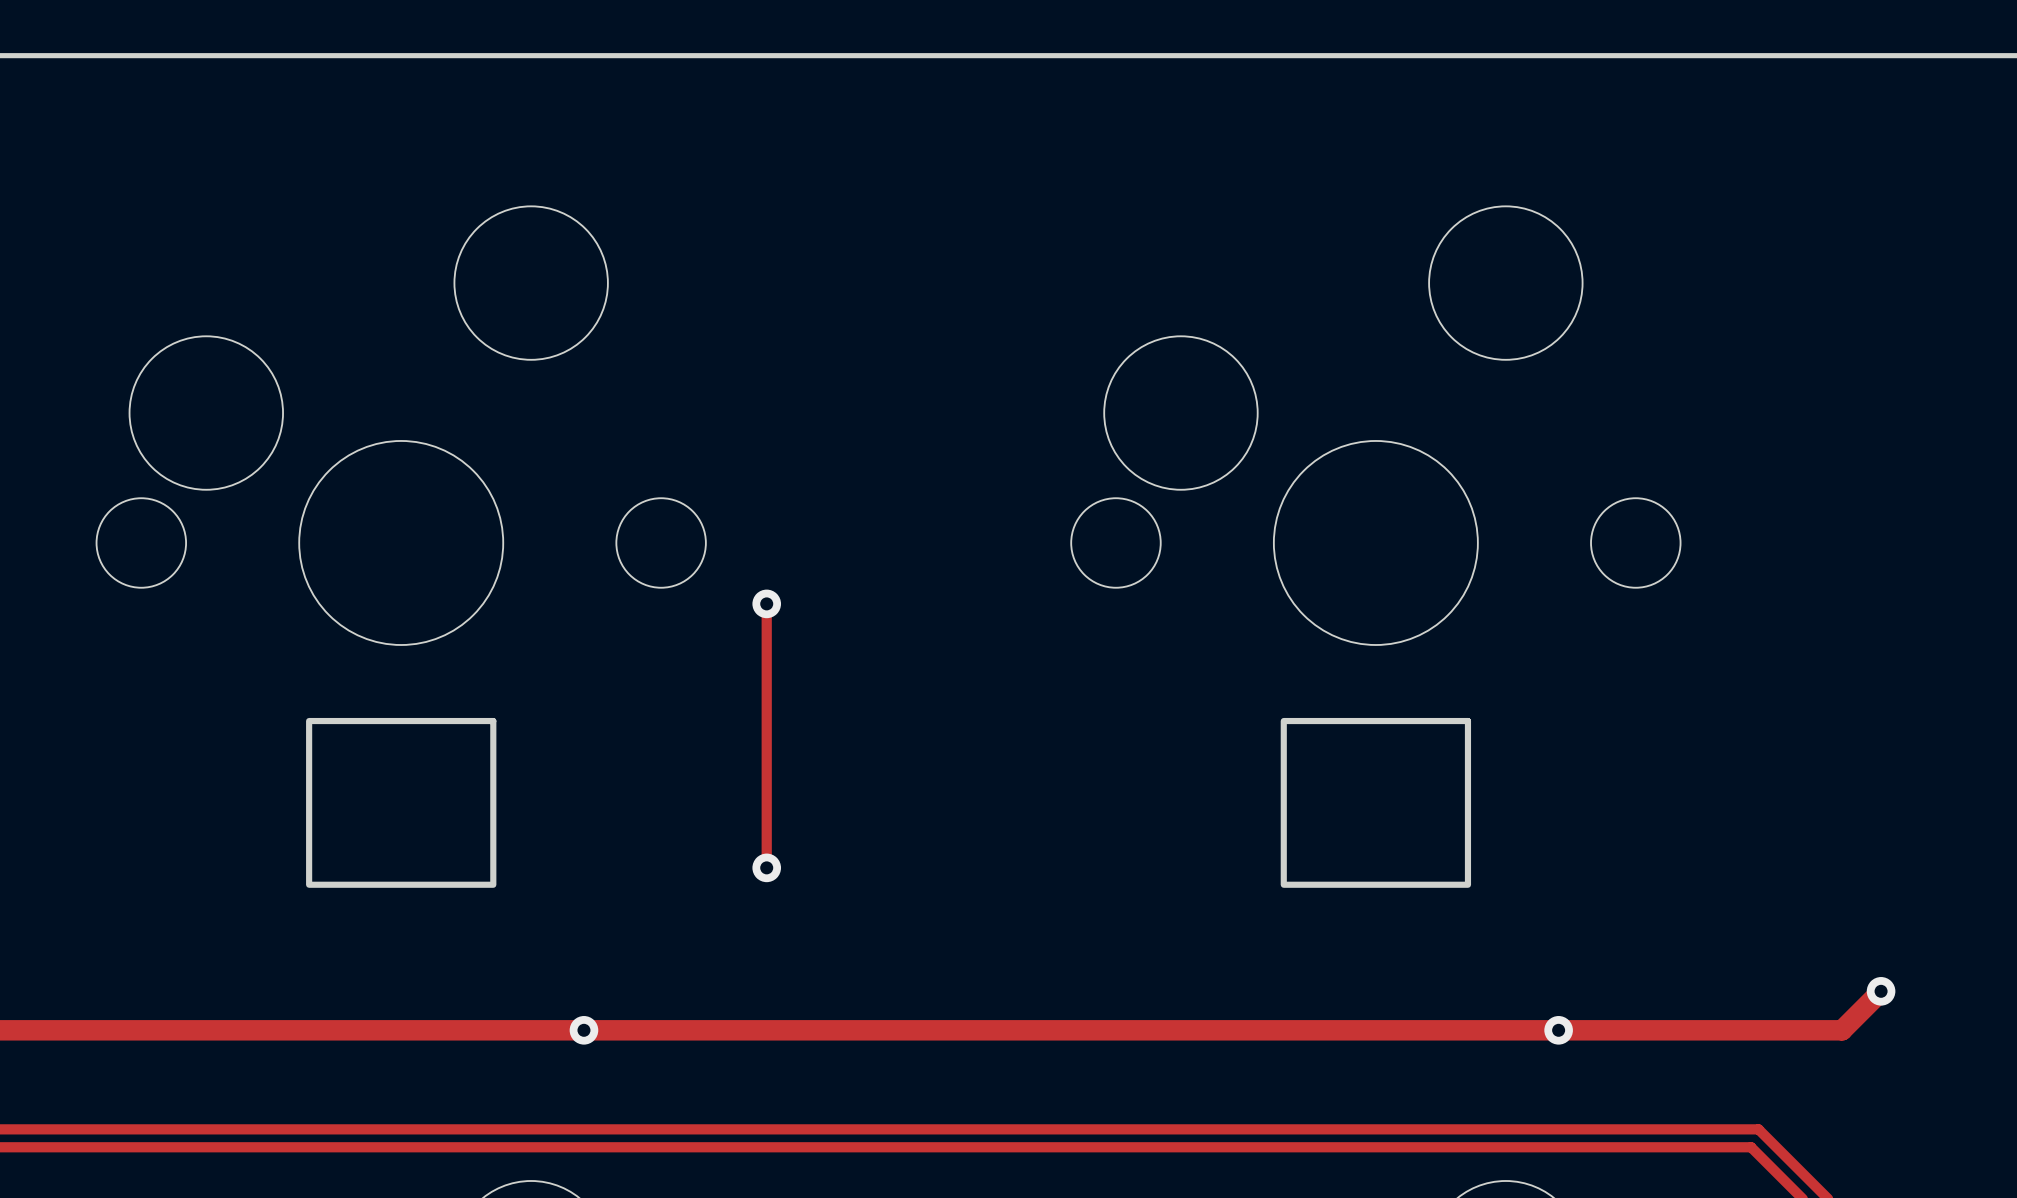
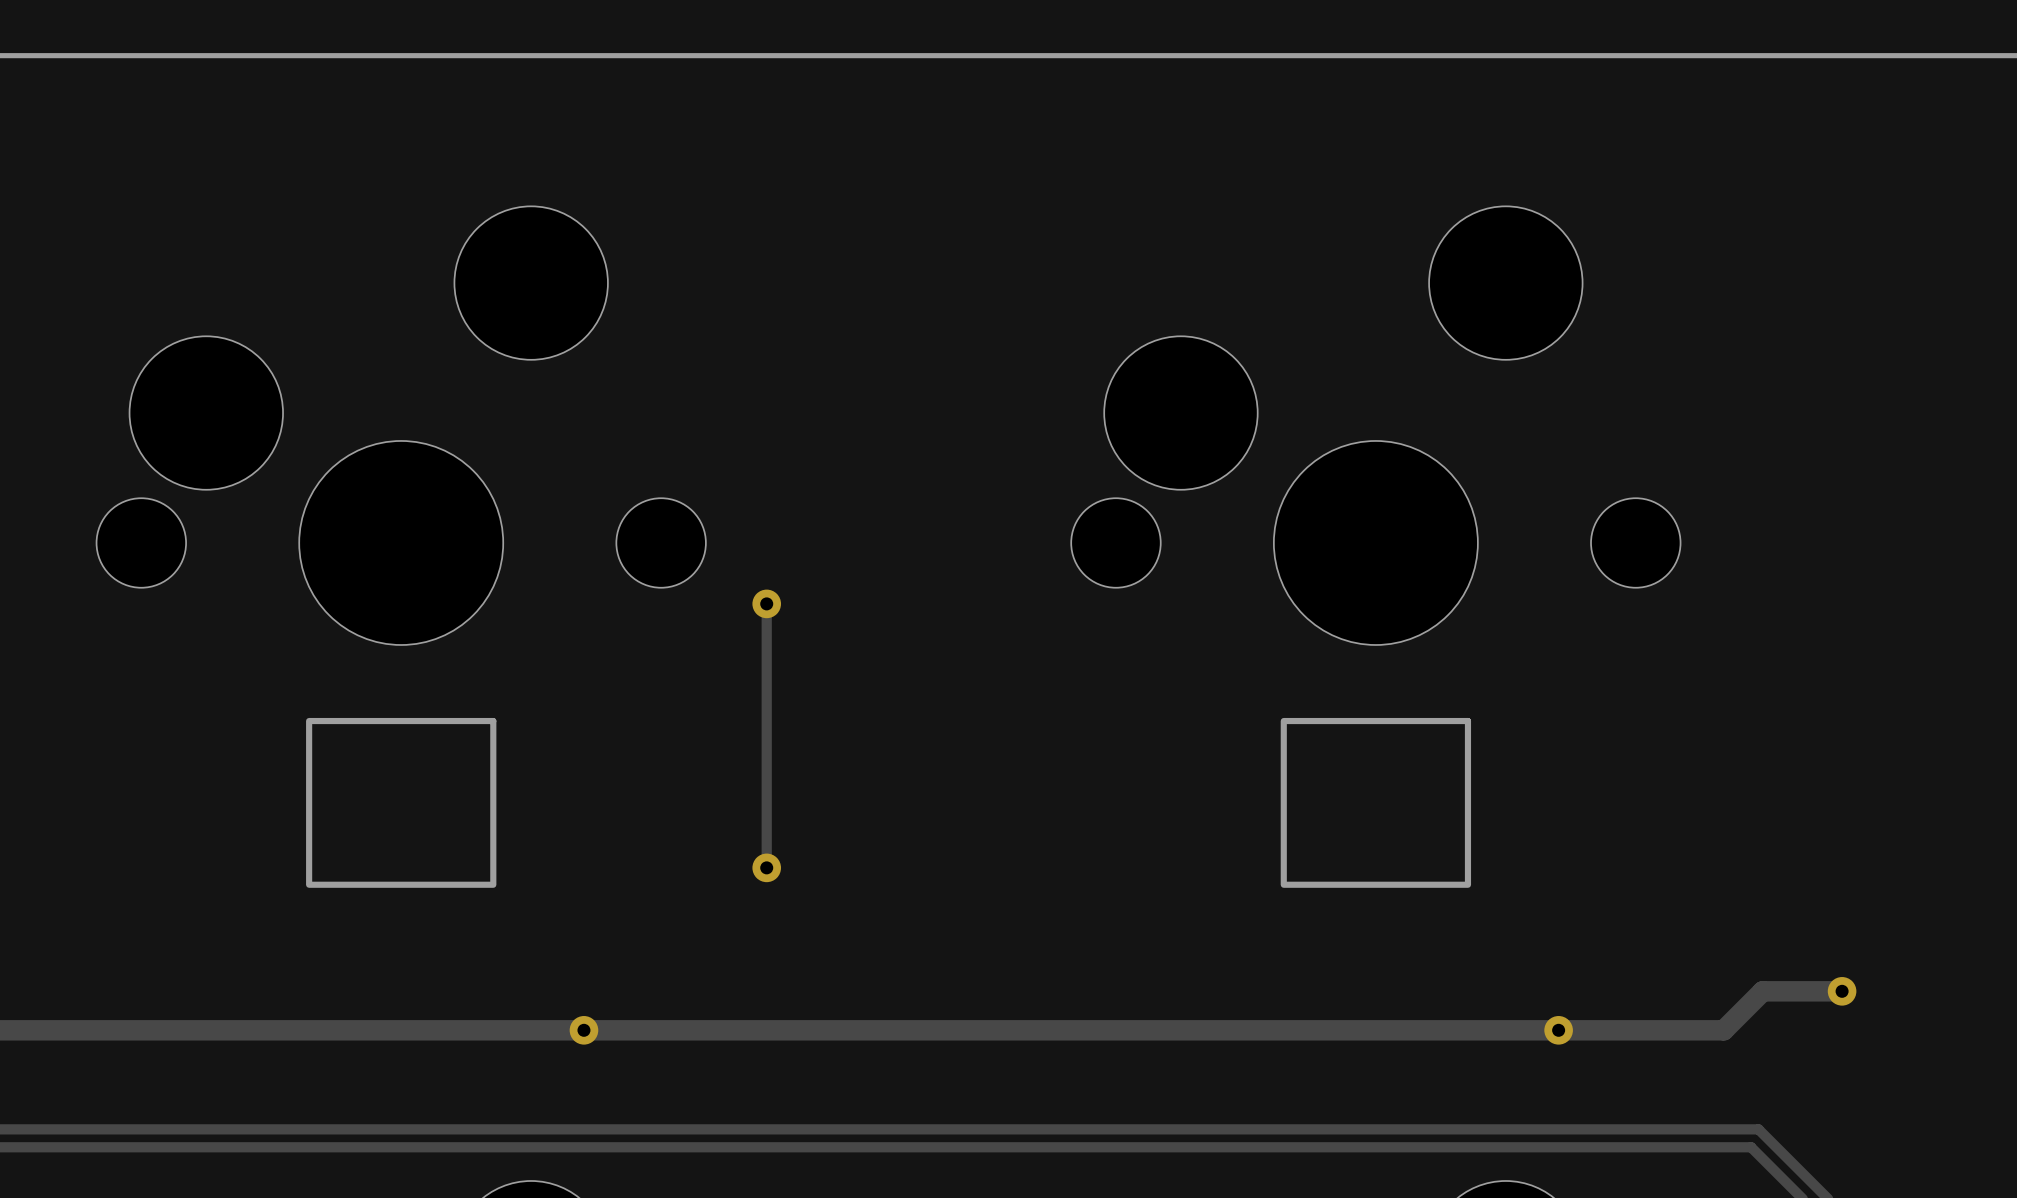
track: (1881, 991) (1842, 1030) (1723, 1030) -> (1842, 991) (1762, 991) (1723, 1030)
via position: (1881, 991) -> (1842, 991)

